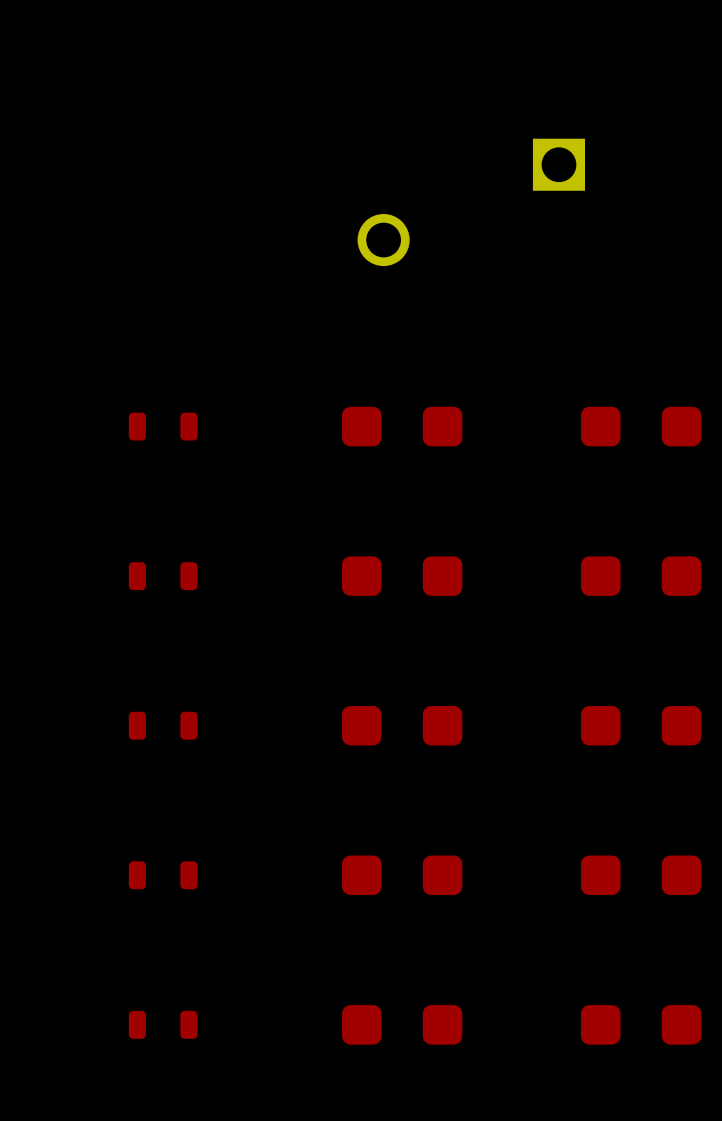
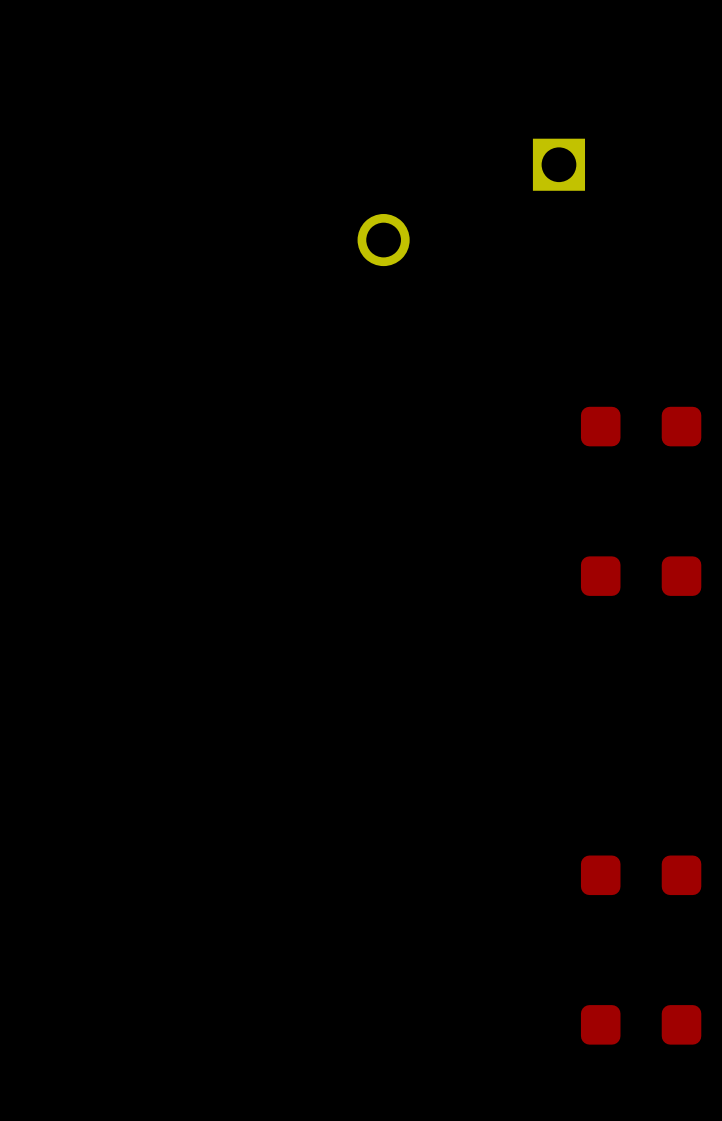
part: (163, 426) -> none
part: (402, 426) -> none
part: (163, 576) -> none
part: (402, 576) -> none
part: (163, 725) -> none
part: (402, 725) -> none
part: (641, 725) -> none
part: (163, 875) -> none
part: (402, 875) -> none
part: (163, 1024) -> none
part: (402, 1024) -> none

